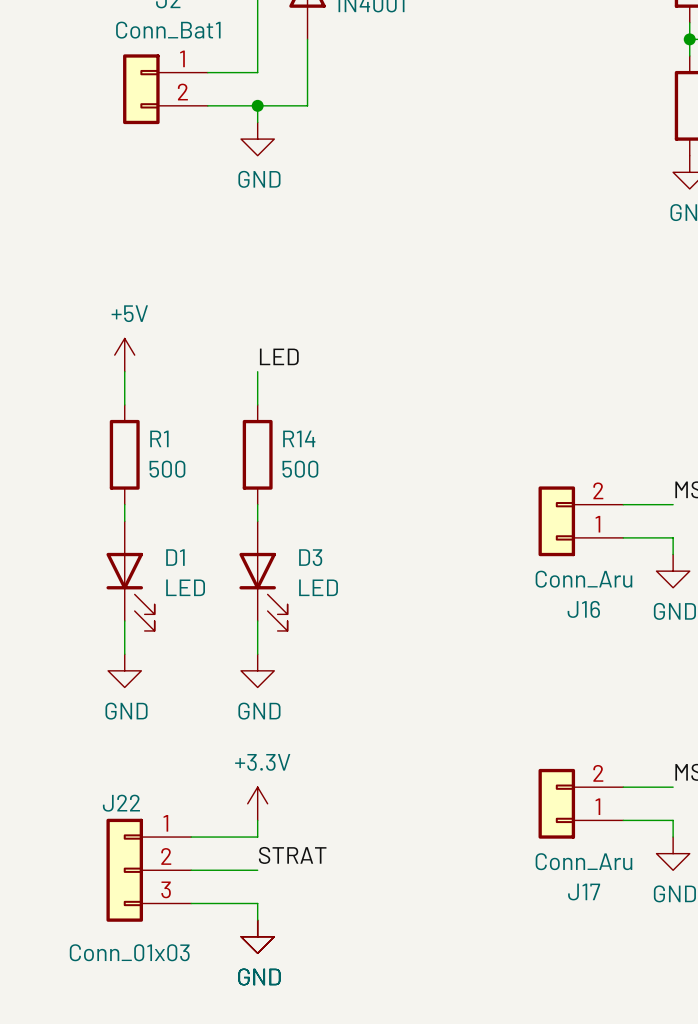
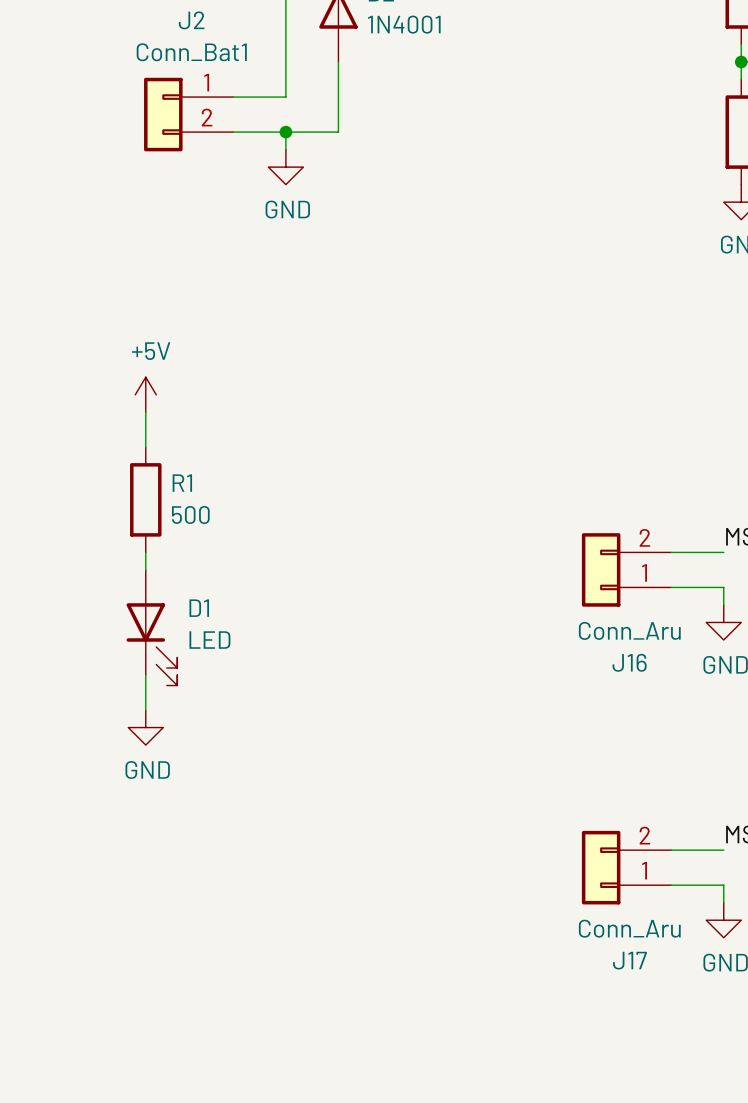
label: LED (279, 356) -> none
wire: (257, 371) (257, 404) -> none
R14: 500 (257, 454) -> none
wire: (257, 504) (257, 521) -> none
D3: LED (263, 576) -> none
wire: (257, 620) (257, 654) -> none
power symbol: GND (257, 670) -> none
power symbol: +3.3V (257, 803) -> none
wire: (257, 820) (257, 837) (191, 837) -> none
label: STRAT (292, 855) -> none
J22: Conn_01x03 (148, 870) -> none
wire: (191, 870) (257, 870) -> none
wire: (191, 903) (257, 903) (257, 920) -> none
power symbol: GND (257, 936) -> none

